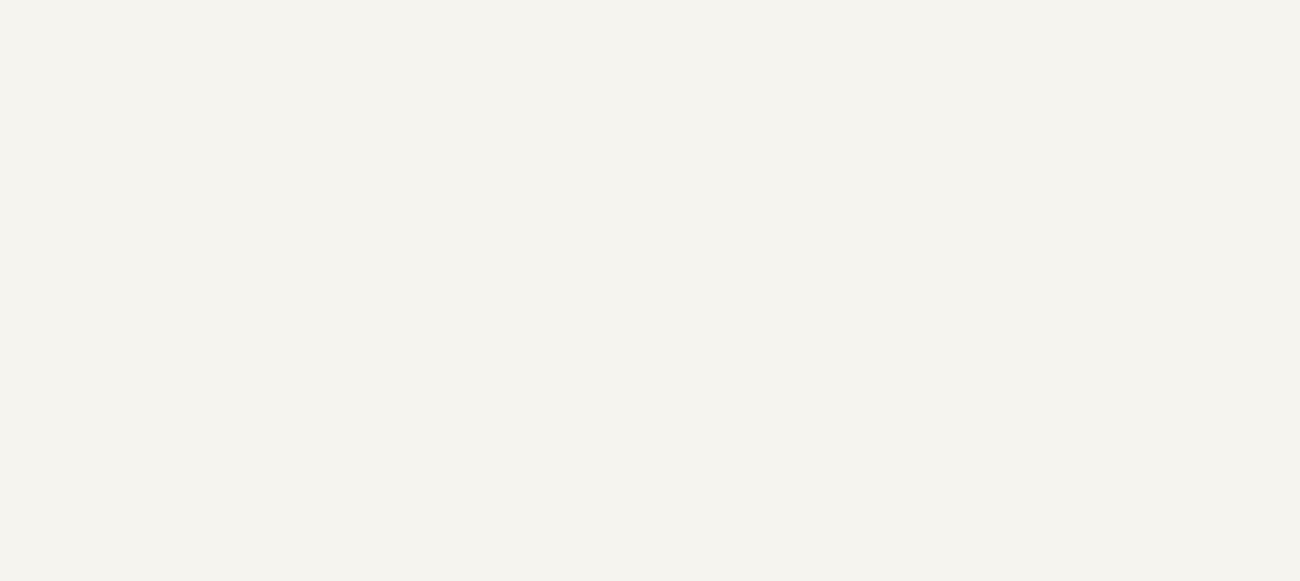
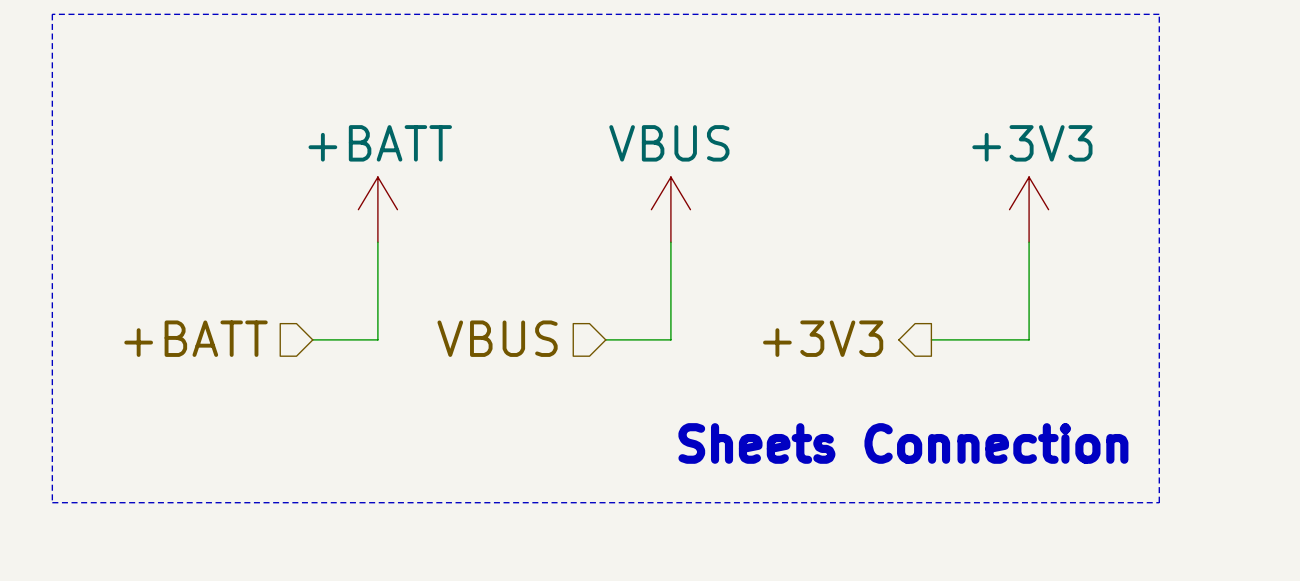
line: none -> (52, 14) (1159, 14) (1159, 502) (52, 502) (52, 14)
power symbol: none -> +BATT (377, 209)
power symbol: none -> VBUS (670, 209)
power symbol: none -> +3V3 (1029, 209)
wire: none -> (377, 242) (377, 339) (312, 339)
wire: none -> (670, 242) (670, 339) (605, 339)
wire: none -> (1029, 242) (1029, 339) (931, 339)
hierarchical label: none -> +BATT (196, 338)
hierarchical label: none -> VBUS (497, 338)
hierarchical label: none -> +3V3 (823, 338)
text: none -> Sheets Connection (903, 443)

